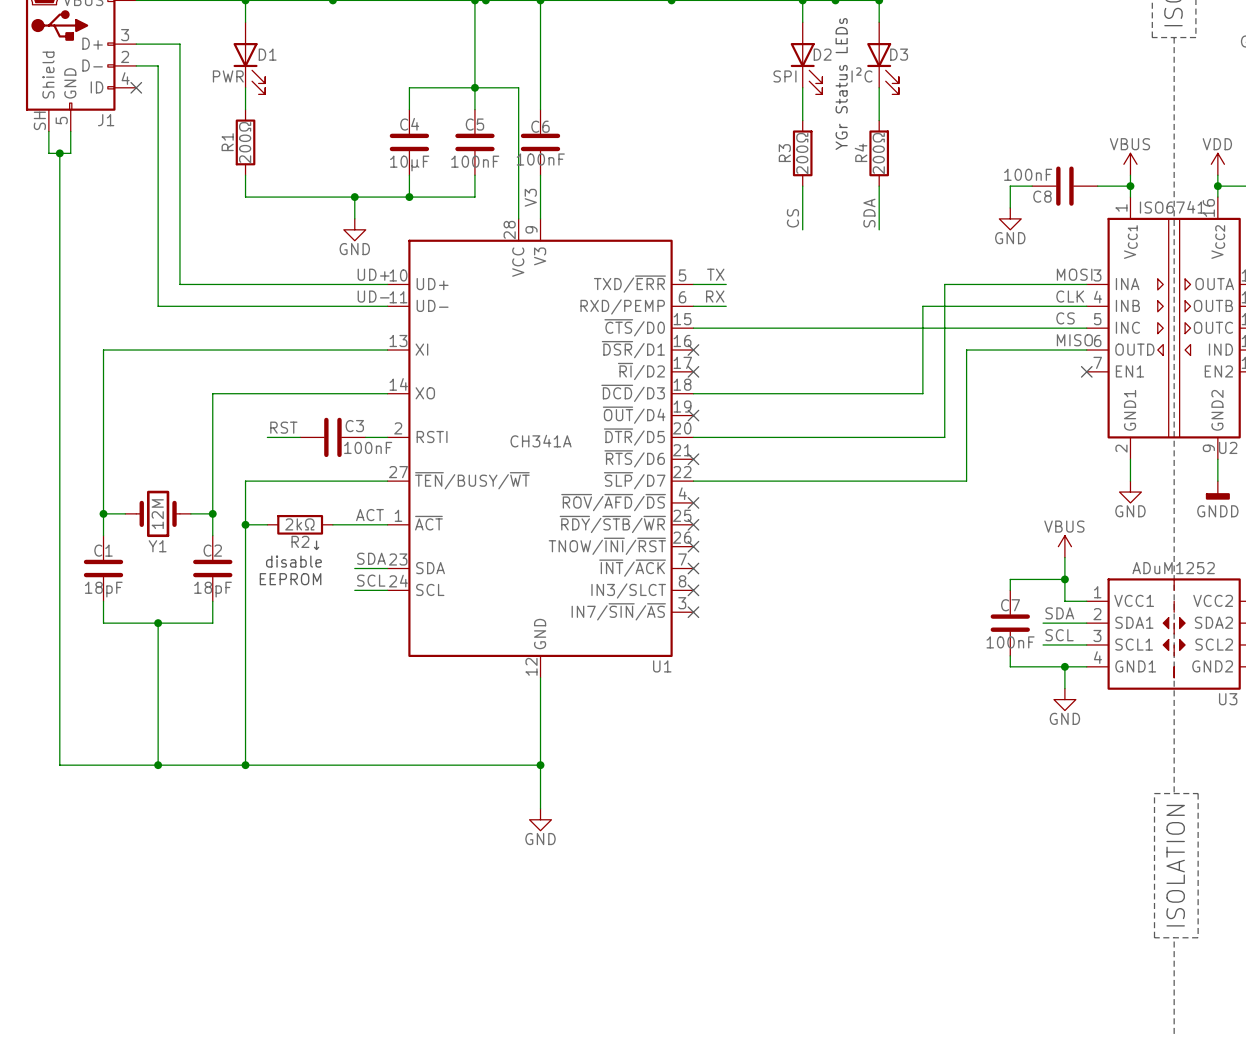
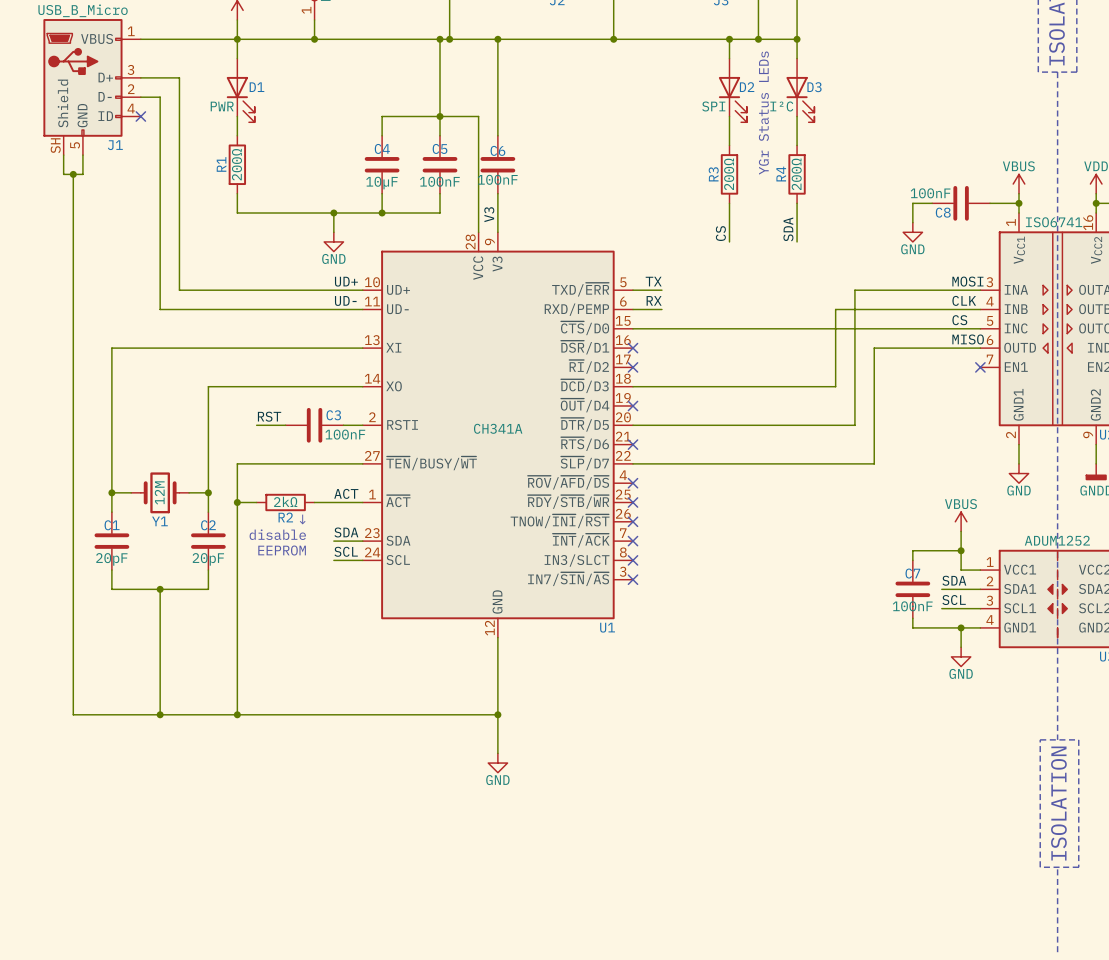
U3 value: ADuM1252 (1173, 568) -> ADUM1252 (1057, 540)
C1 value: 18pF (103, 589) -> 20pF (111, 559)
C2 value: 18pF (213, 589) -> 20pF (208, 559)

